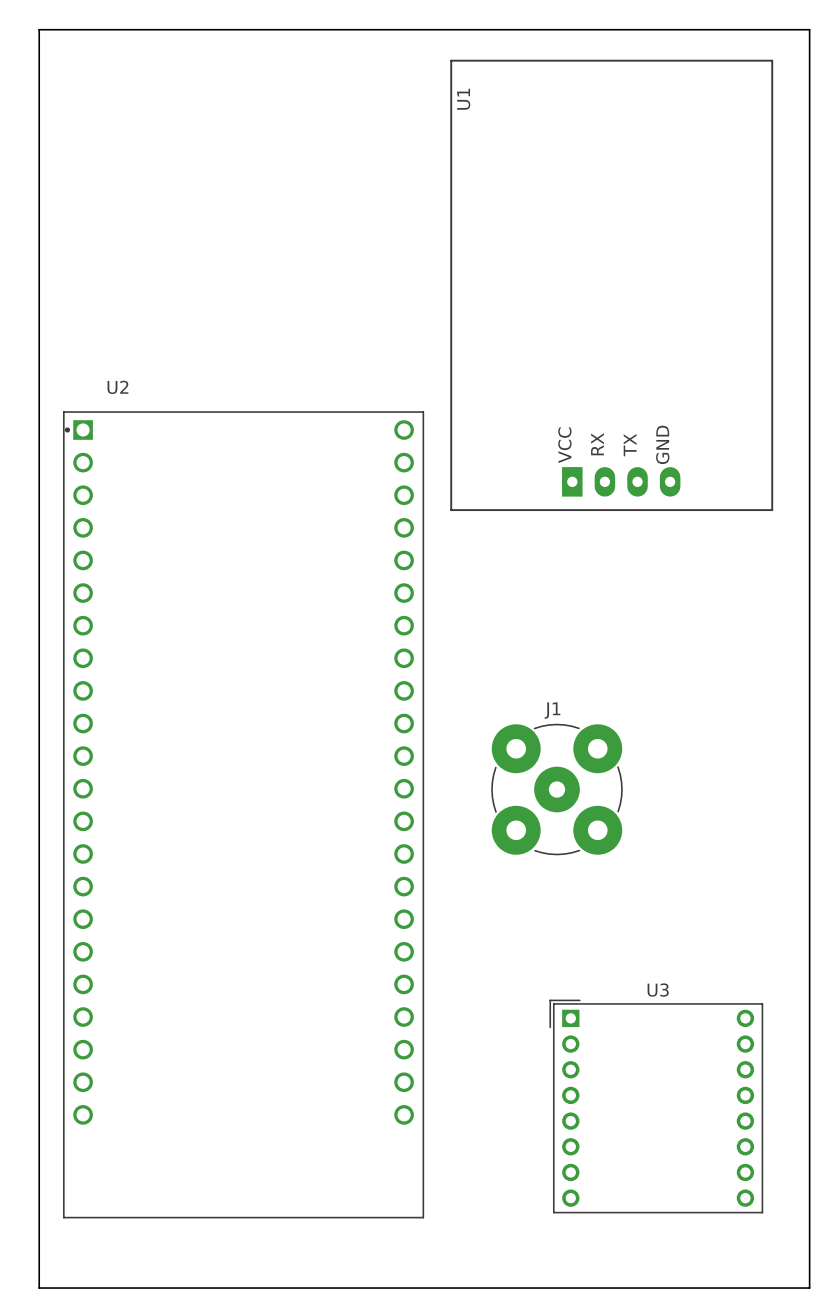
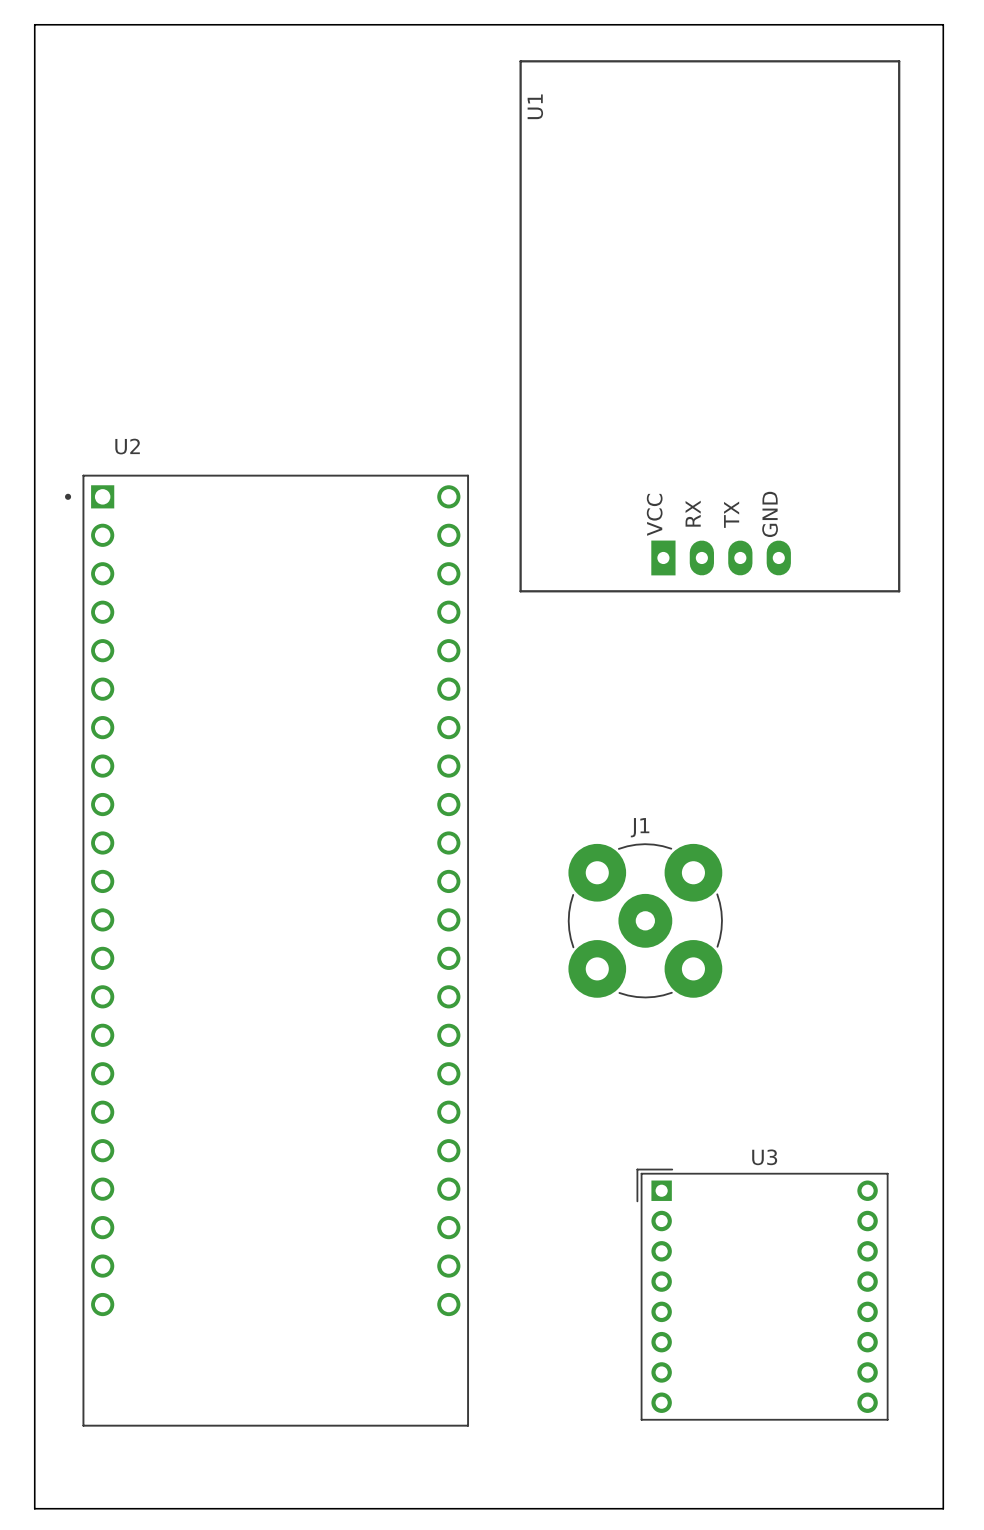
U2 footprint: [63, 411, 425, 1219] -> [65, 474, 470, 1427]

